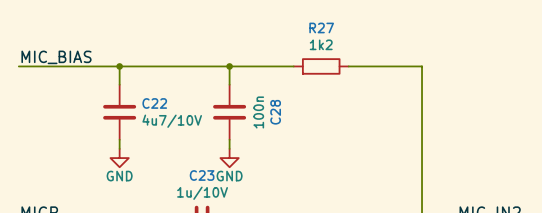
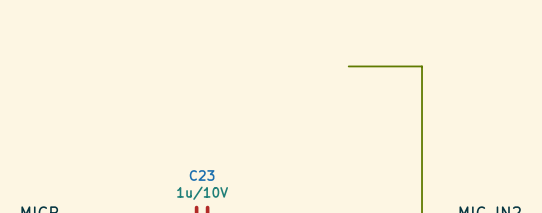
label: MIC_BIAS (56, 57) -> none
wire: (18, 66) (293, 66) -> none
wire: (119, 66) (119, 84) -> none
junction: (119, 66) -> none
wire: (229, 66) (229, 84) -> none
junction: (229, 66) -> none
R27: 1k2 (321, 66) -> none
C22: 4u7/10V (119, 112) -> none
C28: 100n (229, 112) -> none
wire: (119, 139) (119, 148) -> none
wire: (229, 139) (229, 148) -> none
power symbol: GND (119, 158) -> none
power symbol: GND (229, 158) -> none

